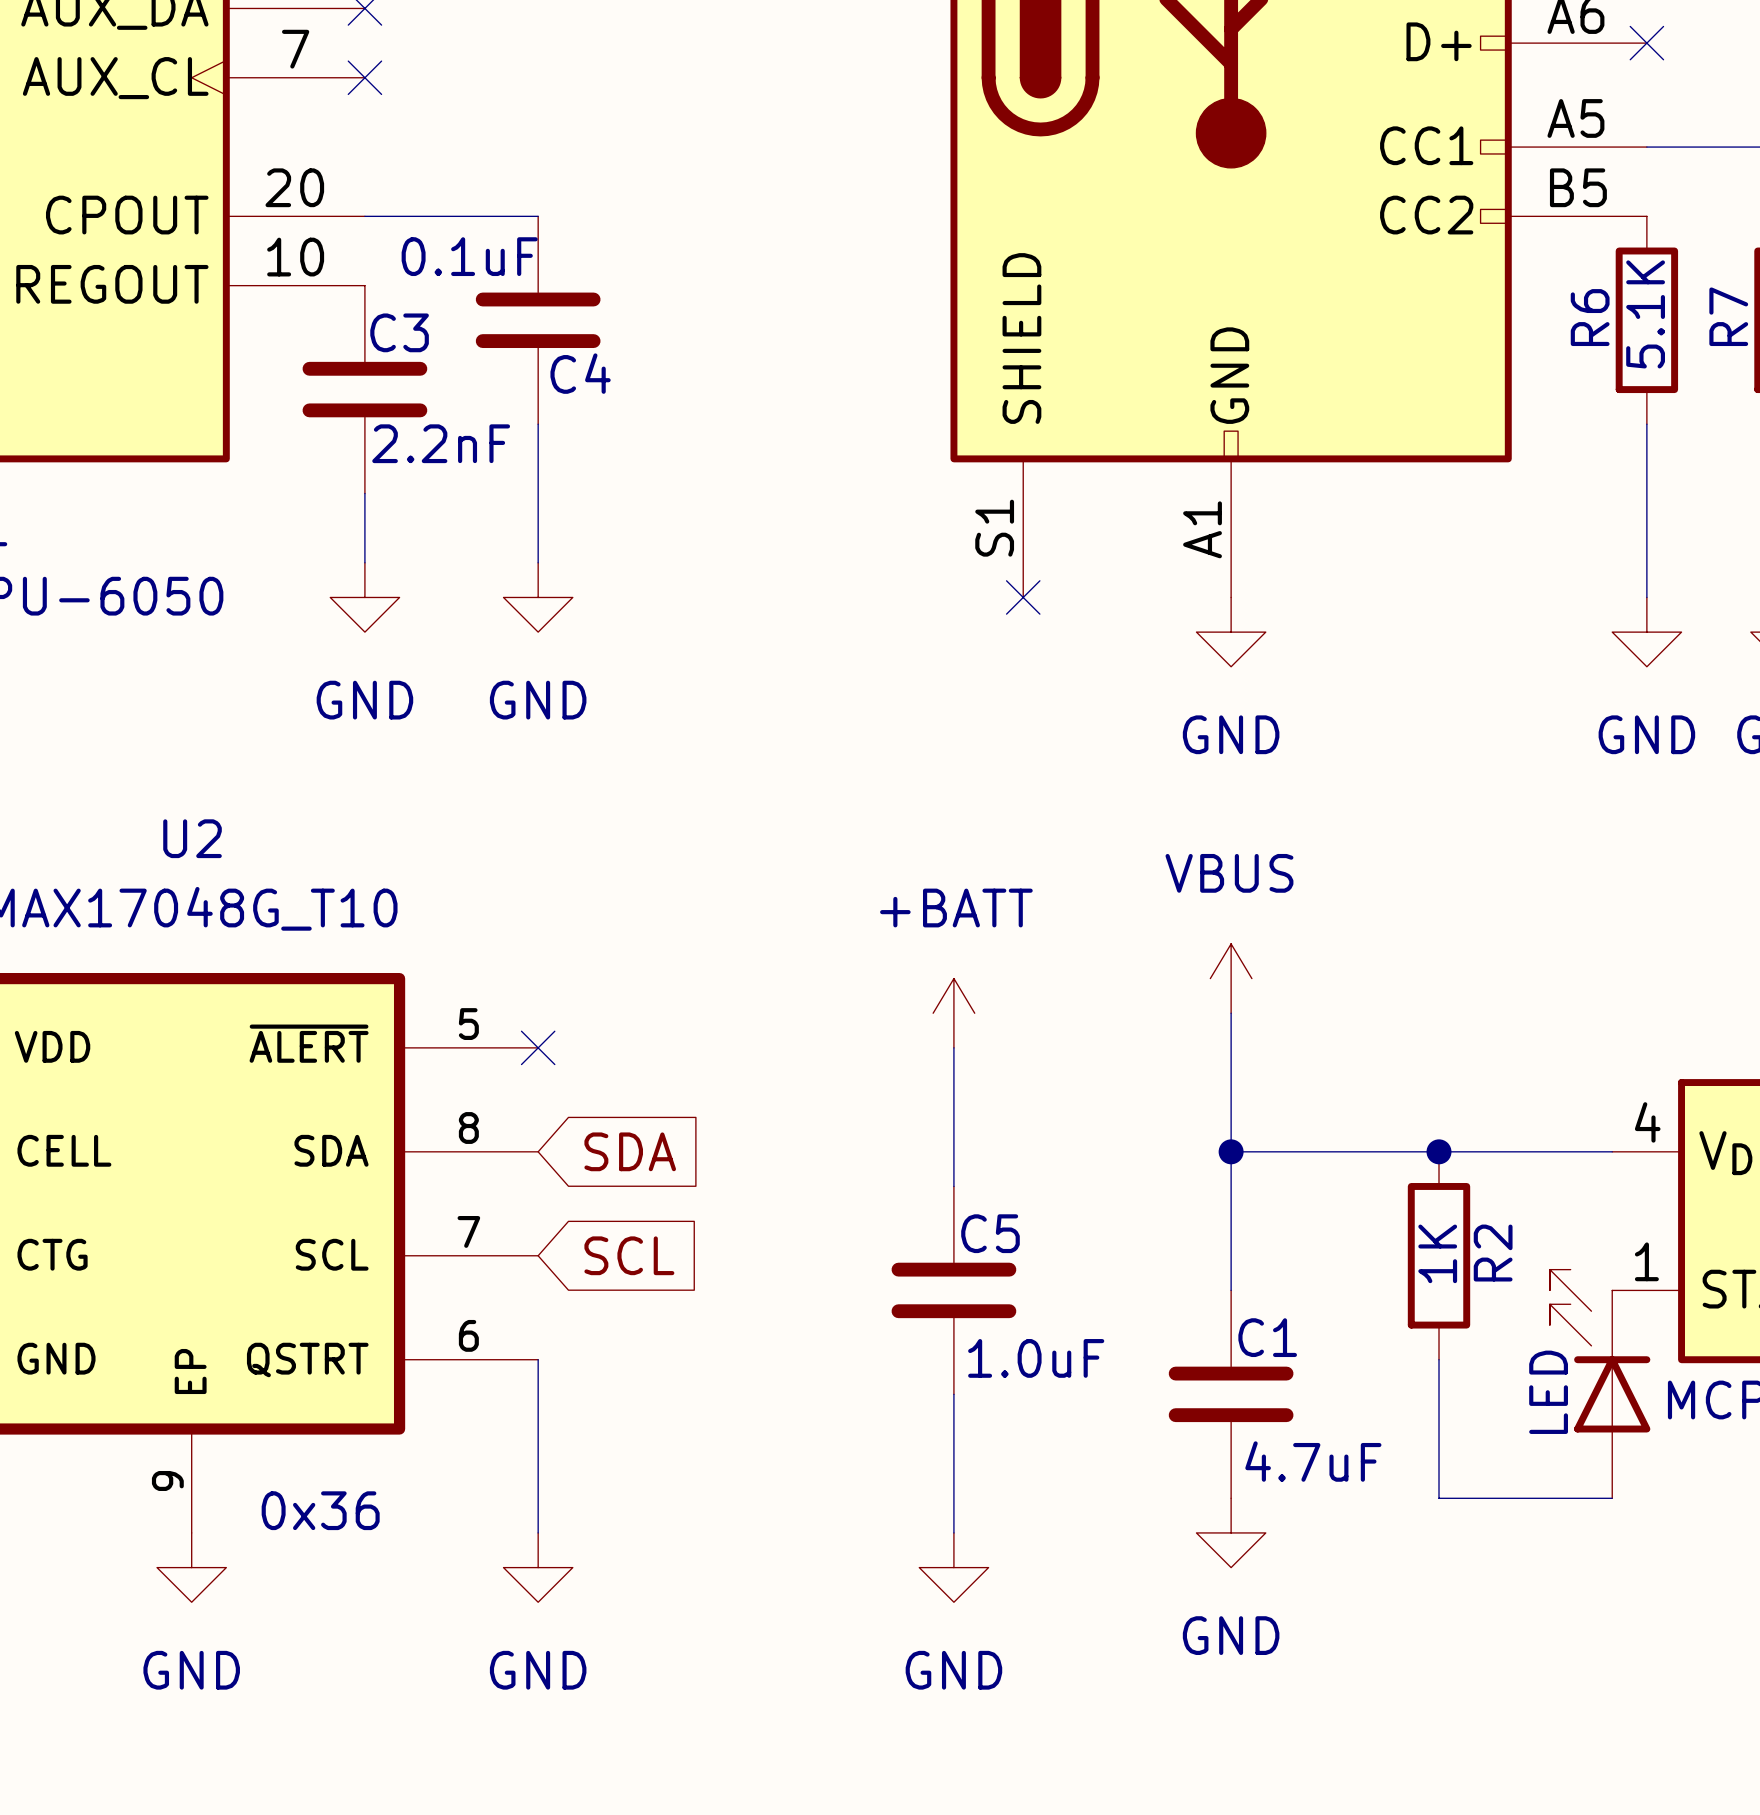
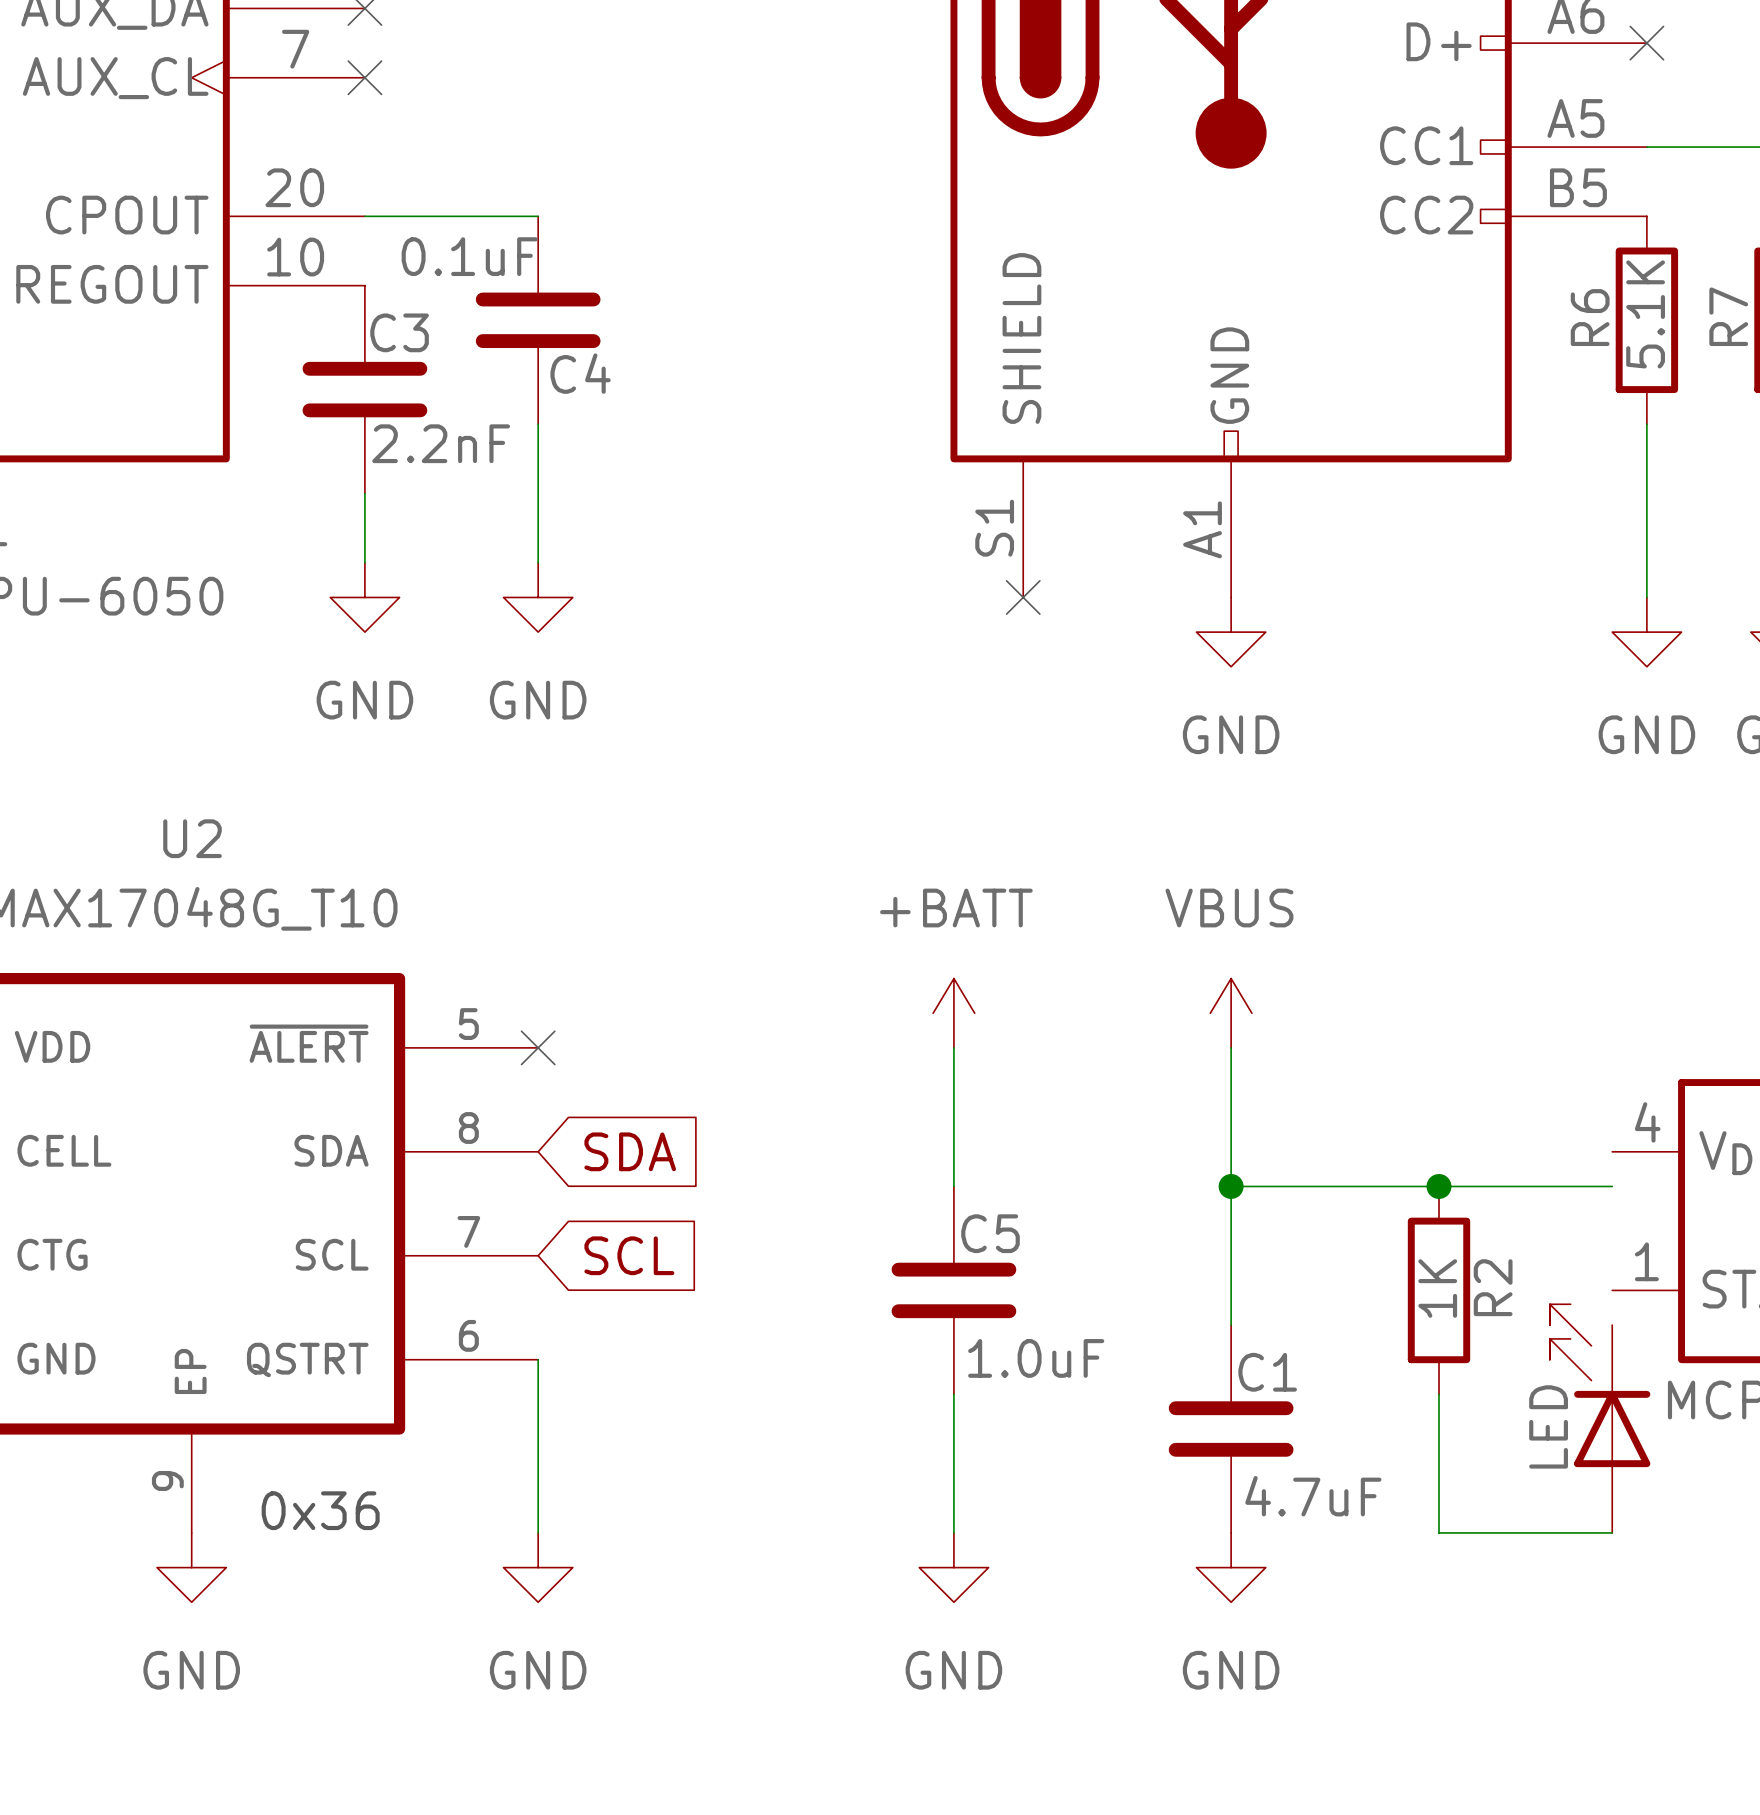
power symbol position: VBUS (1231, 978) -> VBUS (1231, 1013)
wire: (1231, 1151) (1612, 1151) -> (1231, 1186) (1612, 1186)
junction position: (1231, 1151) -> (1231, 1186)
junction position: (1439, 1151) -> (1439, 1186)
R2 position: (1439, 1255) -> (1439, 1290)
part position: (1600, 1383) -> (1600, 1418)
C1 position: (1231, 1394) -> (1231, 1429)
wire: (1439, 1498) (1612, 1498) -> (1439, 1498) (1439, 1532) (1612, 1532)
power symbol position: GND (1231, 1532) -> GND (1231, 1567)

